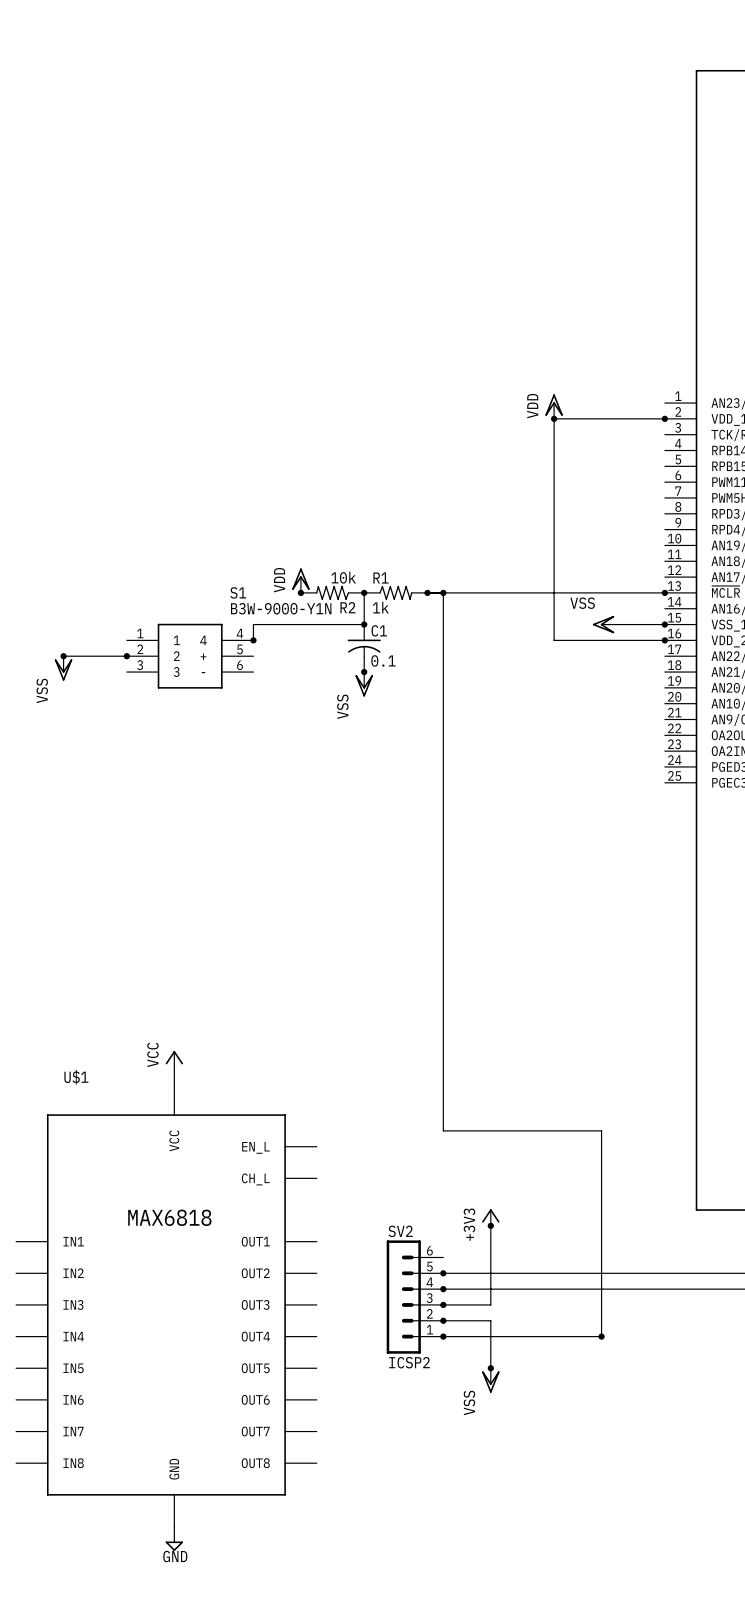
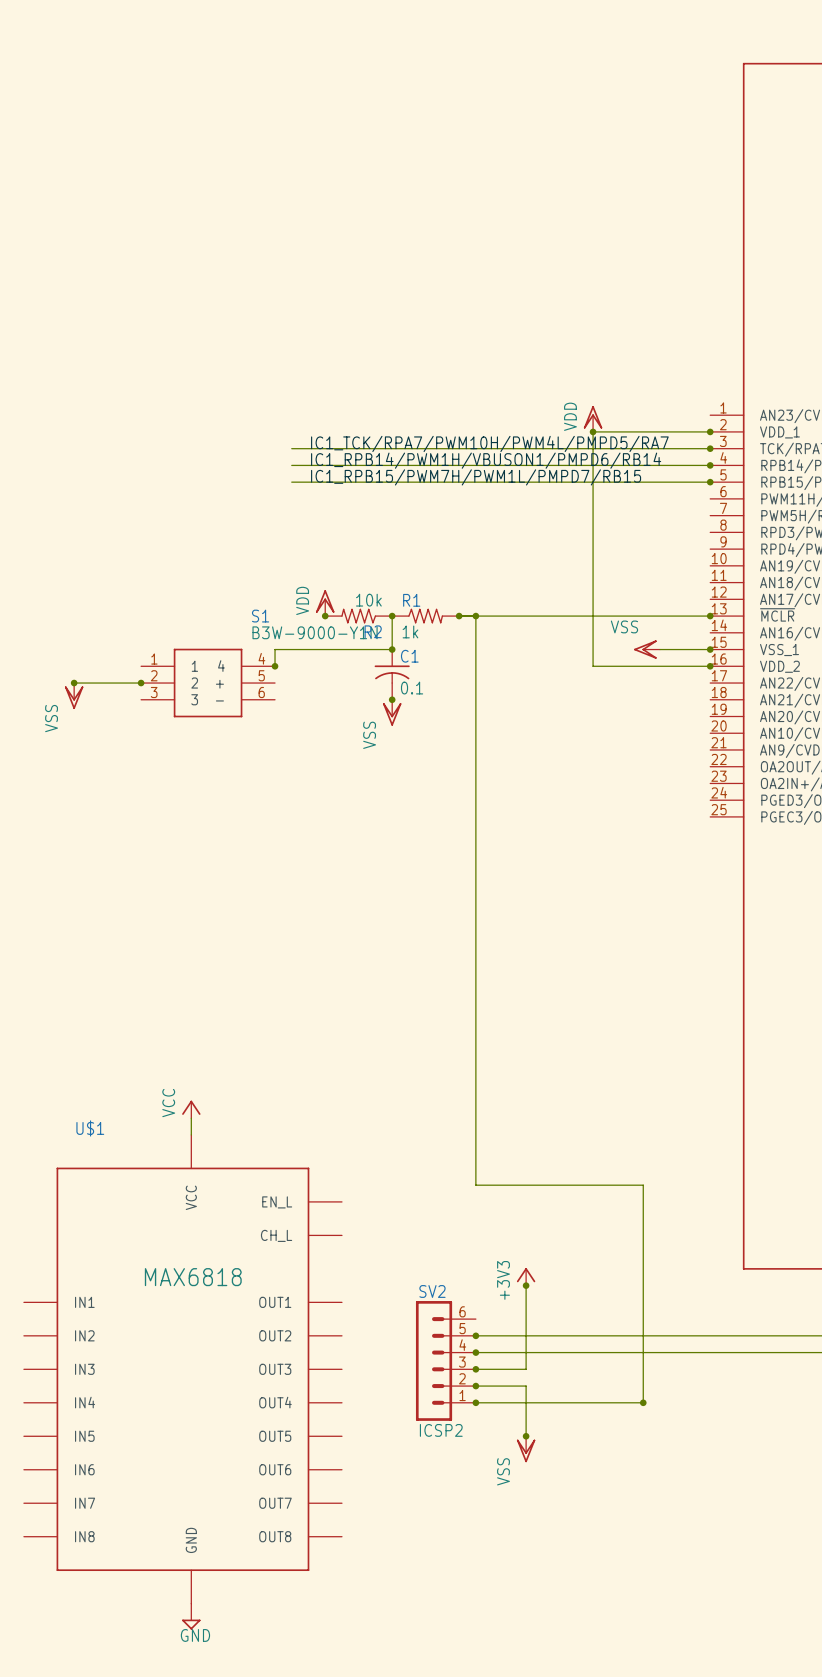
label: none -> IC1_TCK/RPA7/PWM10H/PWM4L/PMPD5/RA7 (489, 443)
wire: none -> (291, 448) (710, 448)
junction: none -> (710, 448)
label: none -> IC1_RPB14/PWM1H/VBUSON1/PMPD6/RB14 (486, 460)
wire: none -> (291, 465) (710, 465)
junction: none -> (710, 465)
label: none -> IC1_RPB15/PWM7H/PWM1L/PMPD7/RB15 (476, 477)
wire: none -> (291, 482) (710, 482)
junction: none -> (710, 482)

